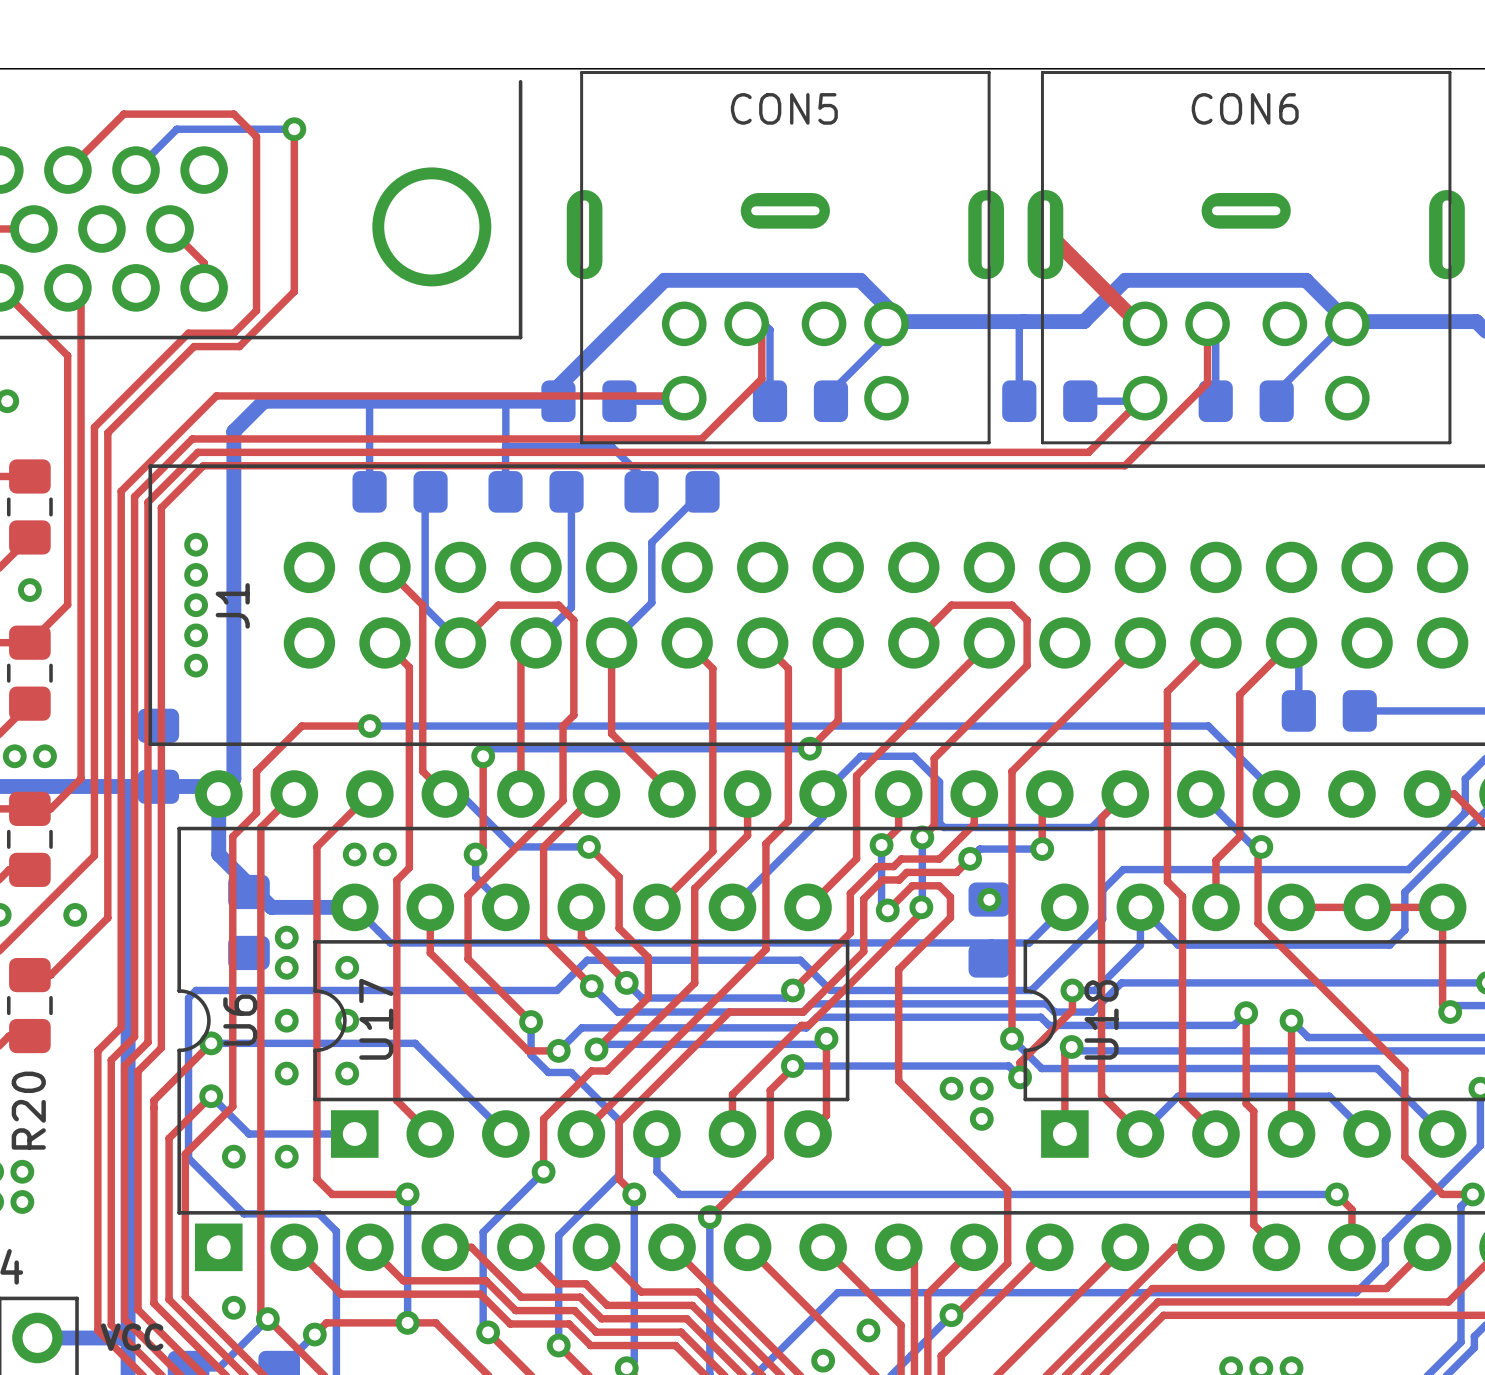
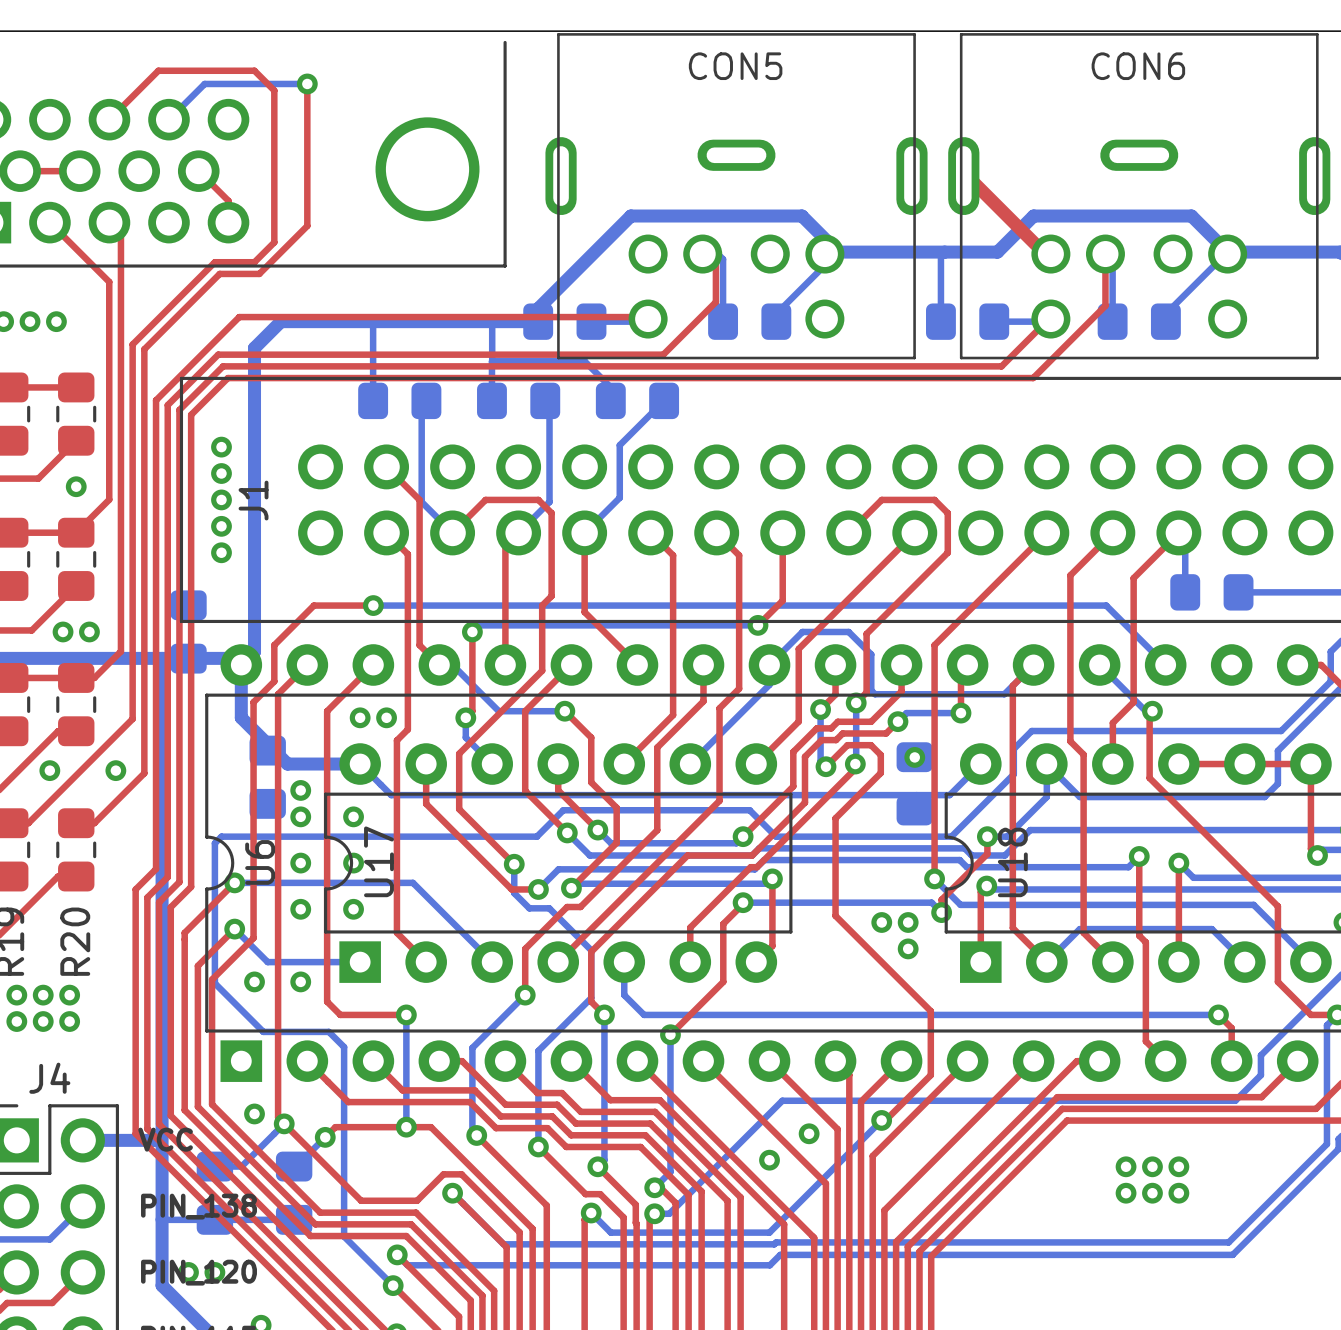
CON5 footprint: [566, 71, 1004, 445] -> [545, 33, 928, 360]
CON6 footprint: [1027, 71, 1465, 445] -> [948, 33, 1331, 360]

